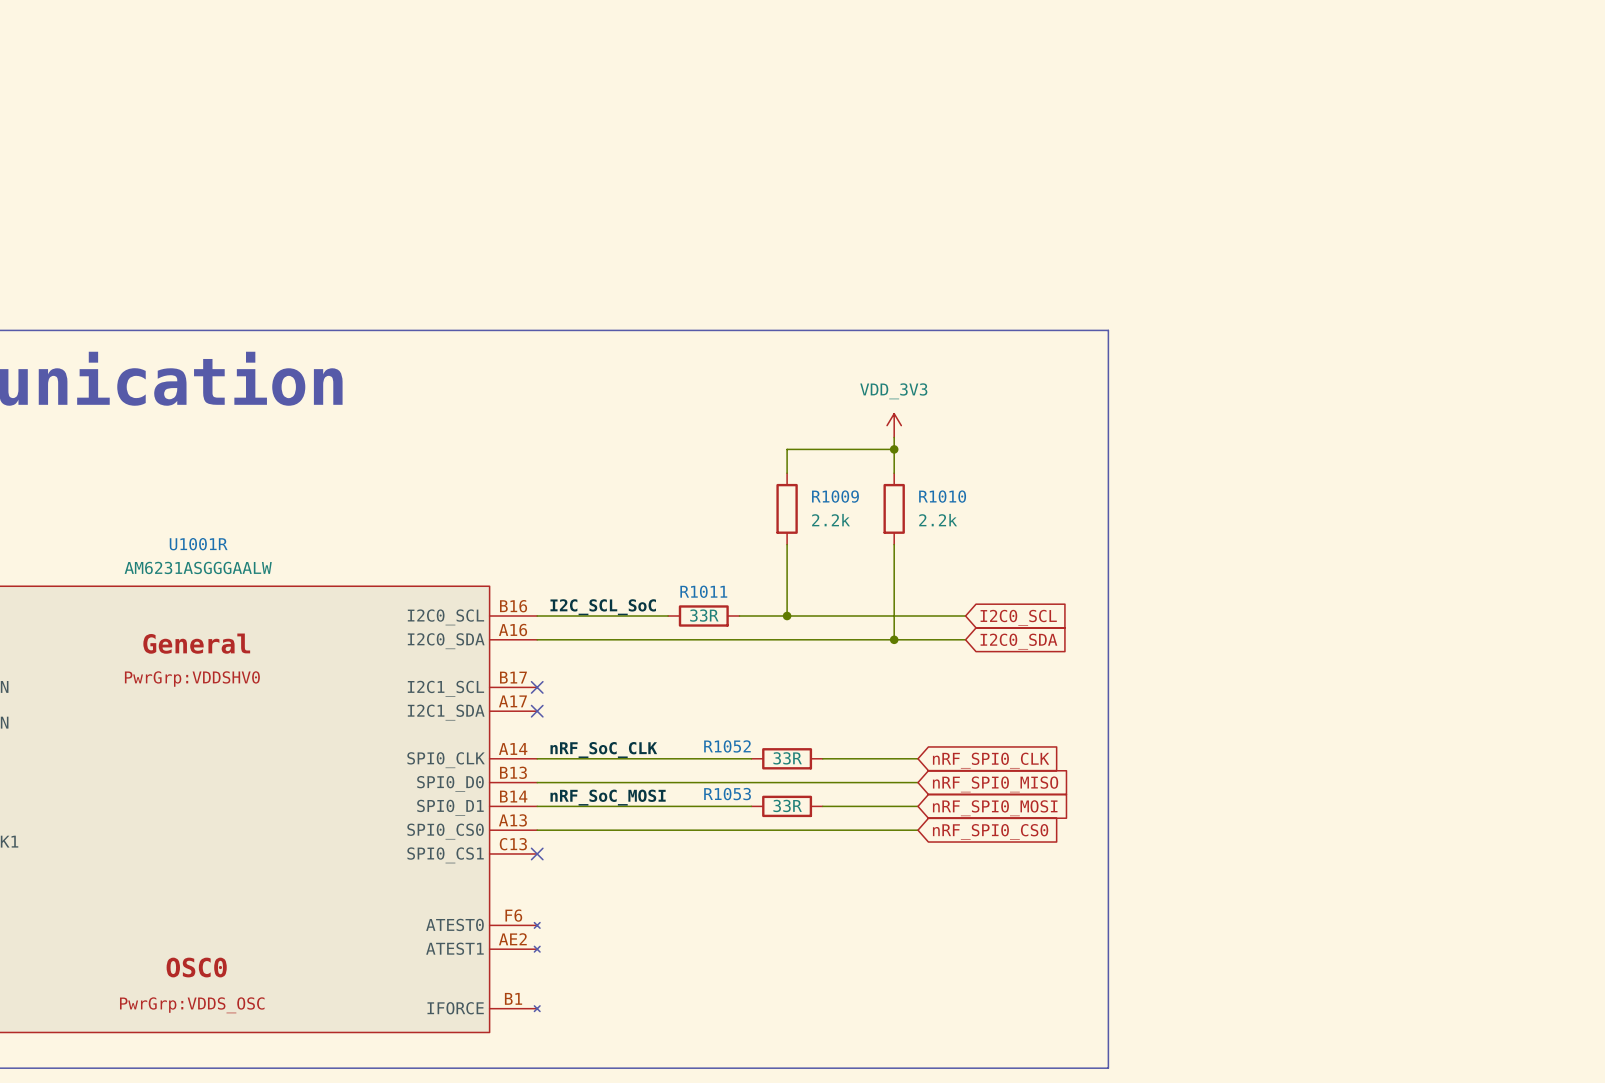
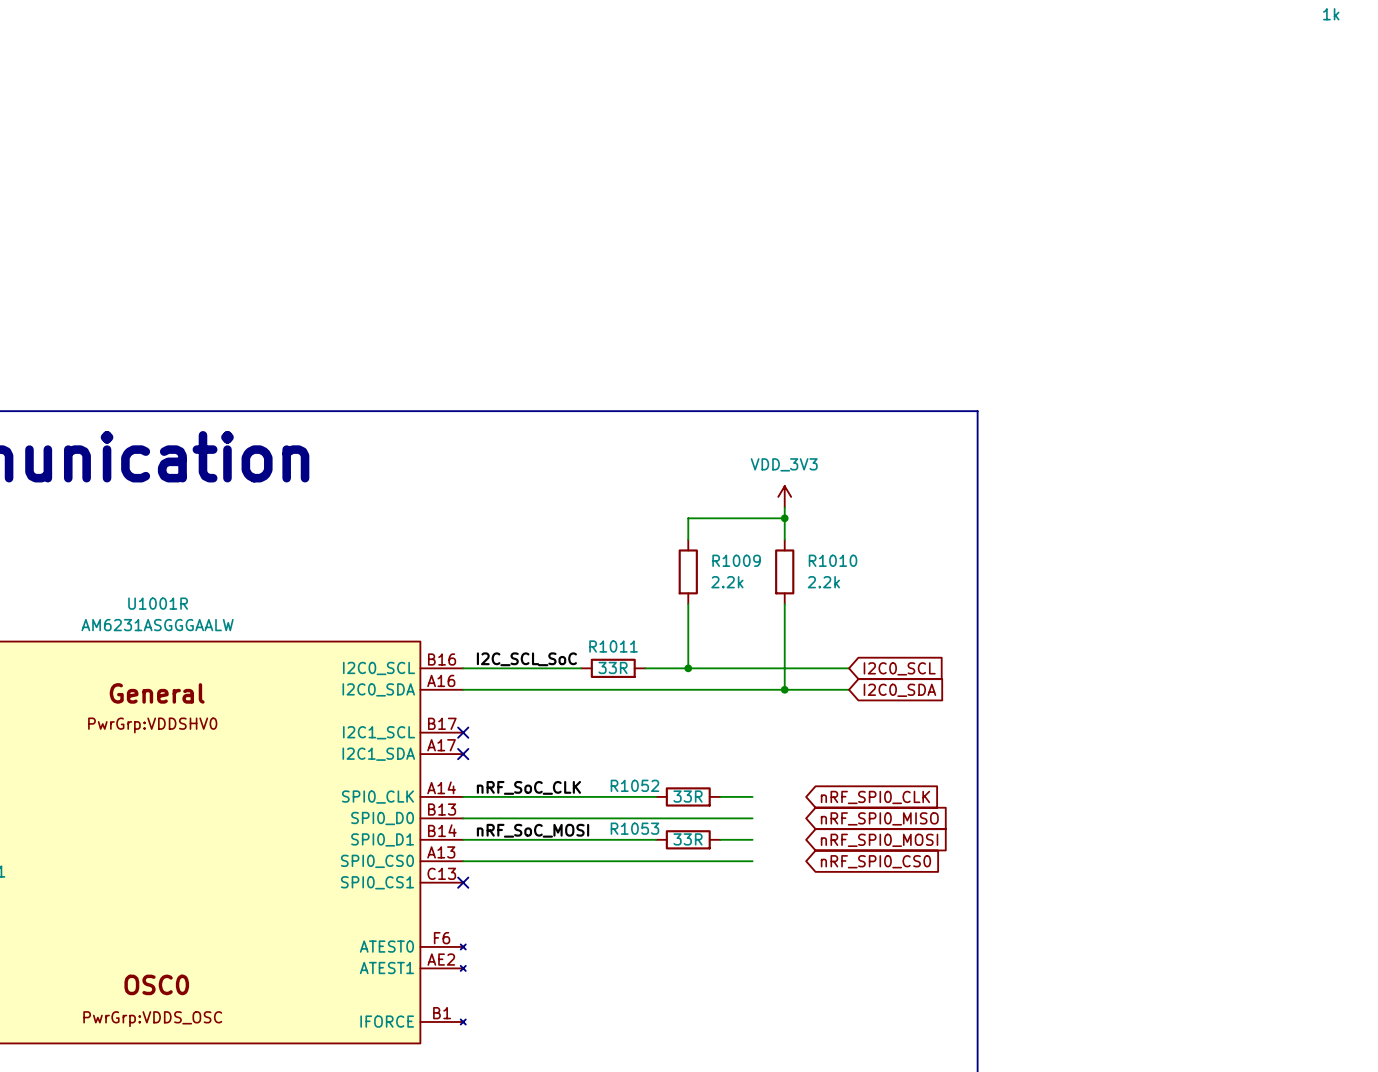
wire: (858, 758) (917, 758) -> none
wire: (858, 782) (917, 782) -> none
wire: (858, 806) (917, 806) -> none
wire: (858, 830) (917, 830) -> none

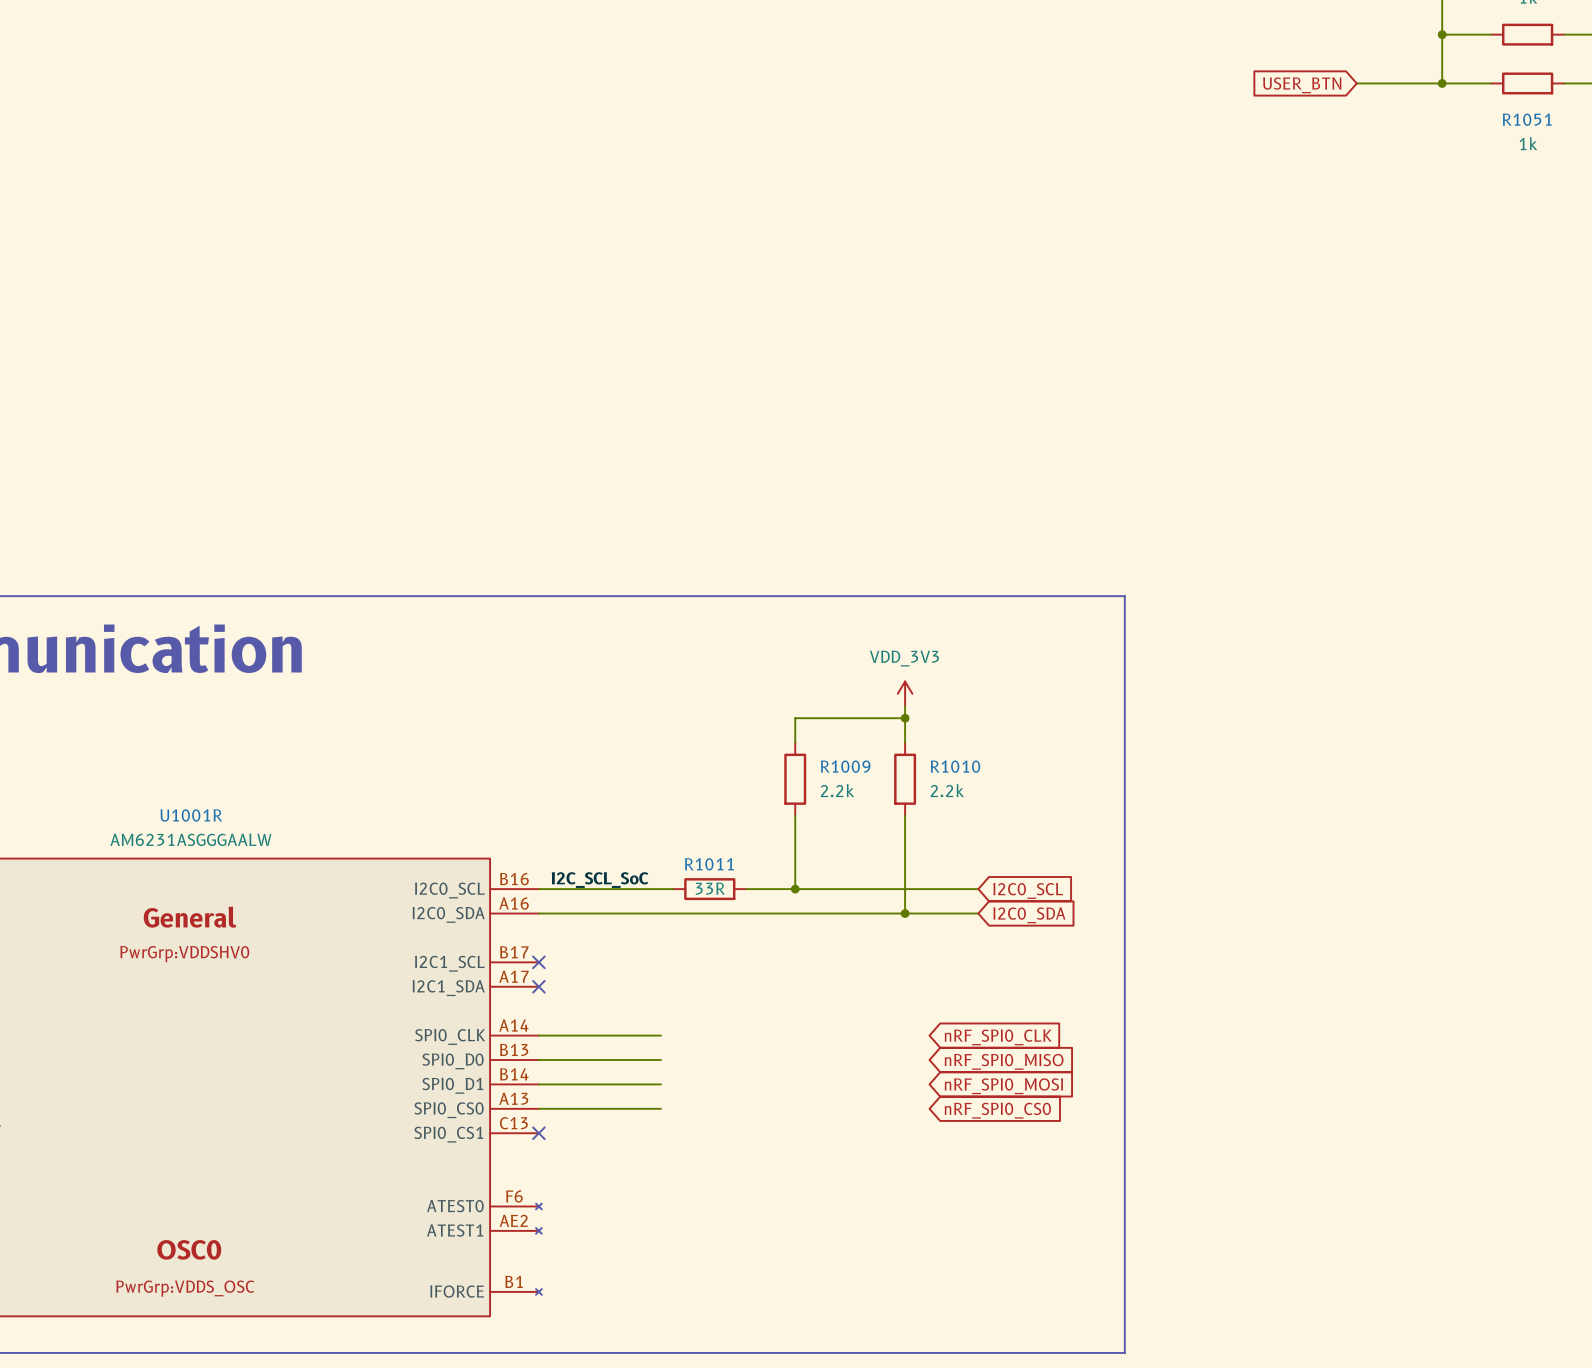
label: nRF_SoC_CLK (528, 787) -> none
wire: (570, 796) (656, 796) -> none
R1052: 33R (688, 796) -> none
wire: (720, 796) (752, 796) -> none
wire: (570, 818) (752, 818) -> none
label: nRF_SoC_MOSI (533, 830) -> none
wire: (570, 839) (656, 839) -> none
R1053: 33R (688, 839) -> none
wire: (720, 839) (752, 839) -> none
wire: (570, 861) (752, 861) -> none

